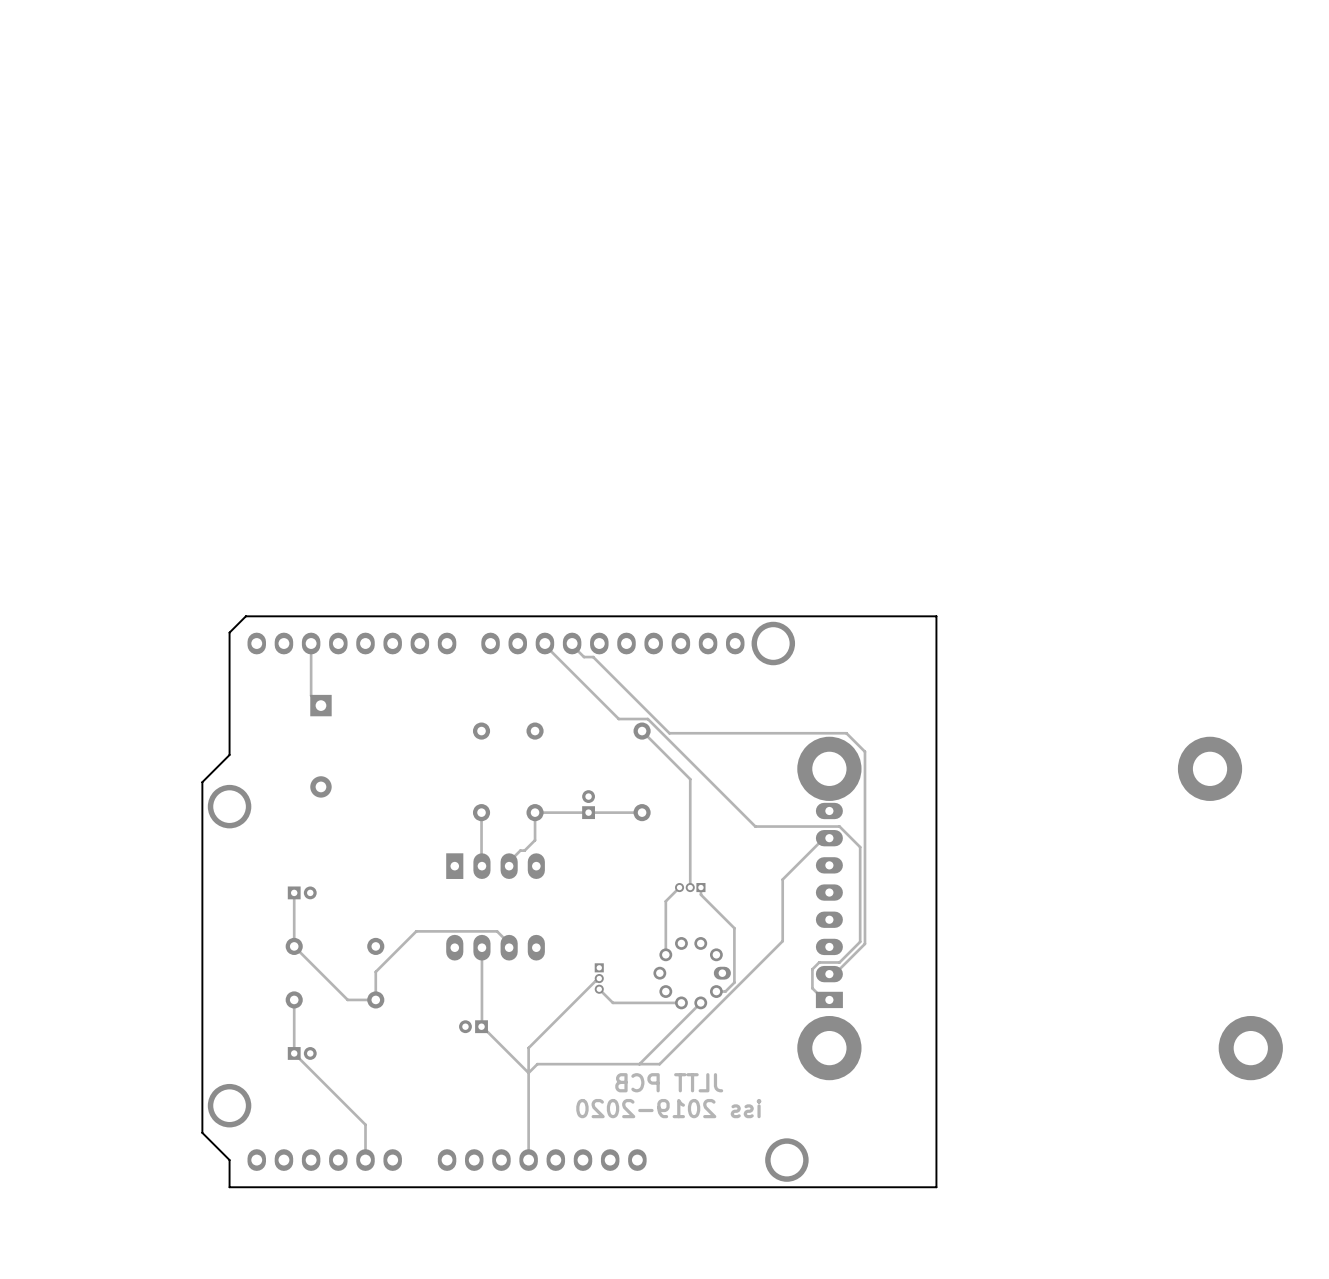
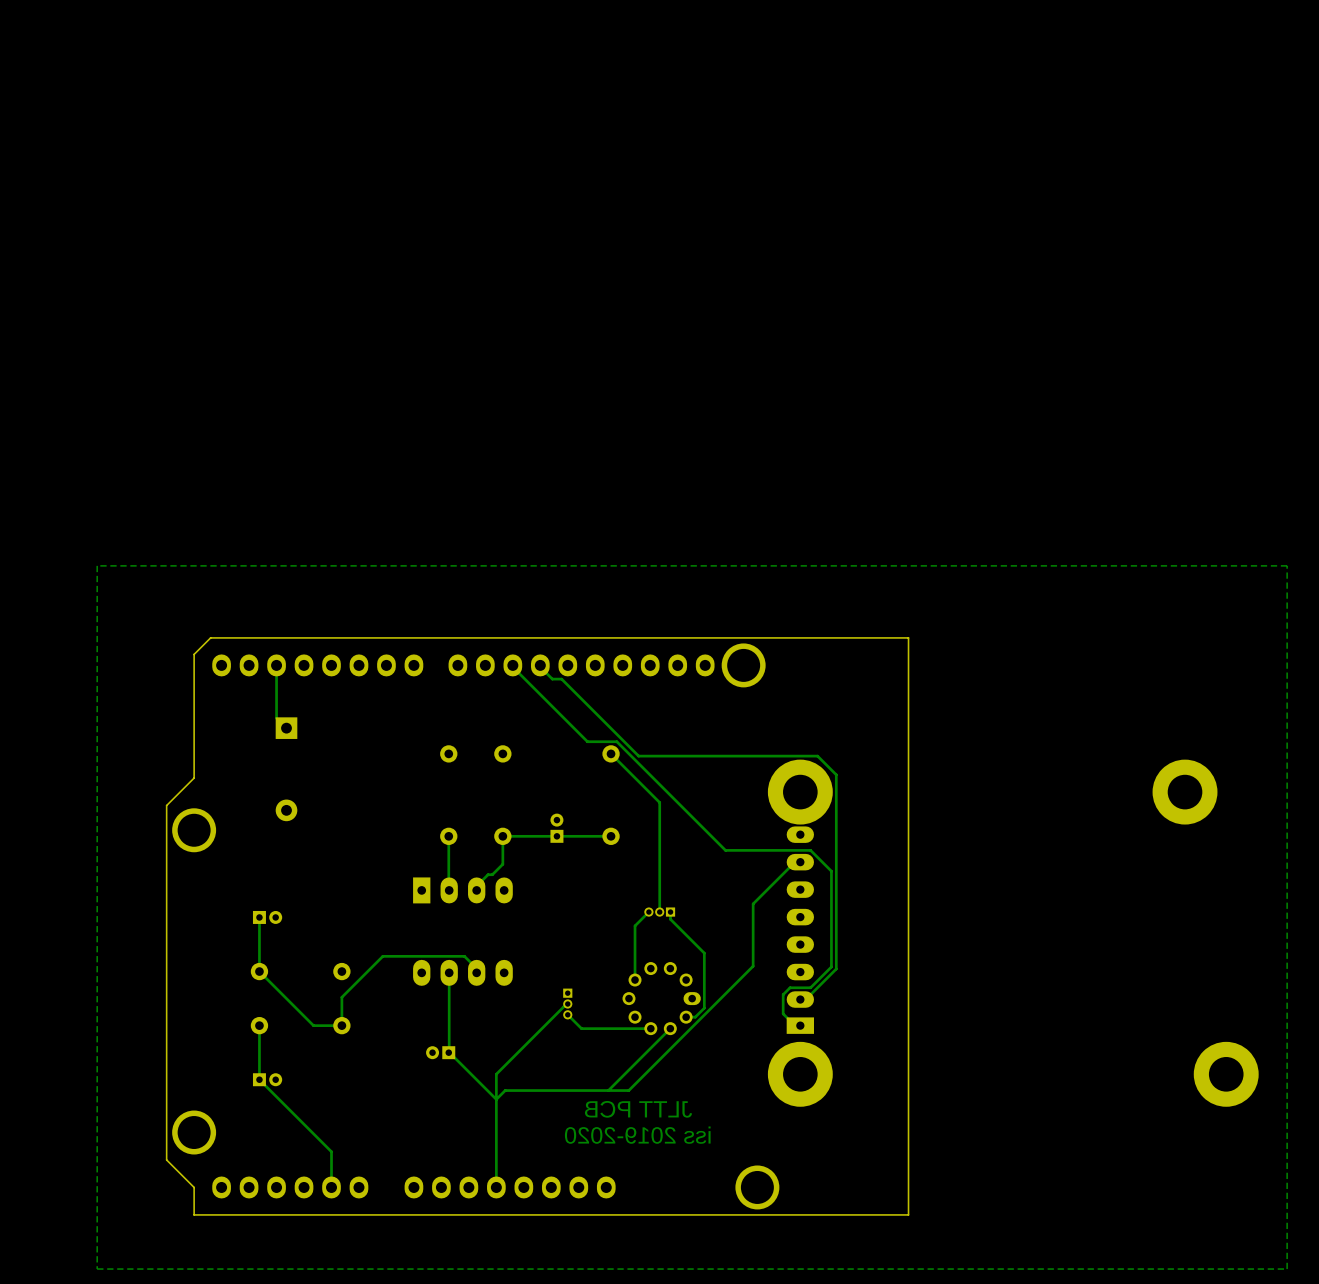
zone outline: none -> (1287, 565) (1287, 1269) (97, 1269) (97, 565) (1287, 565)

